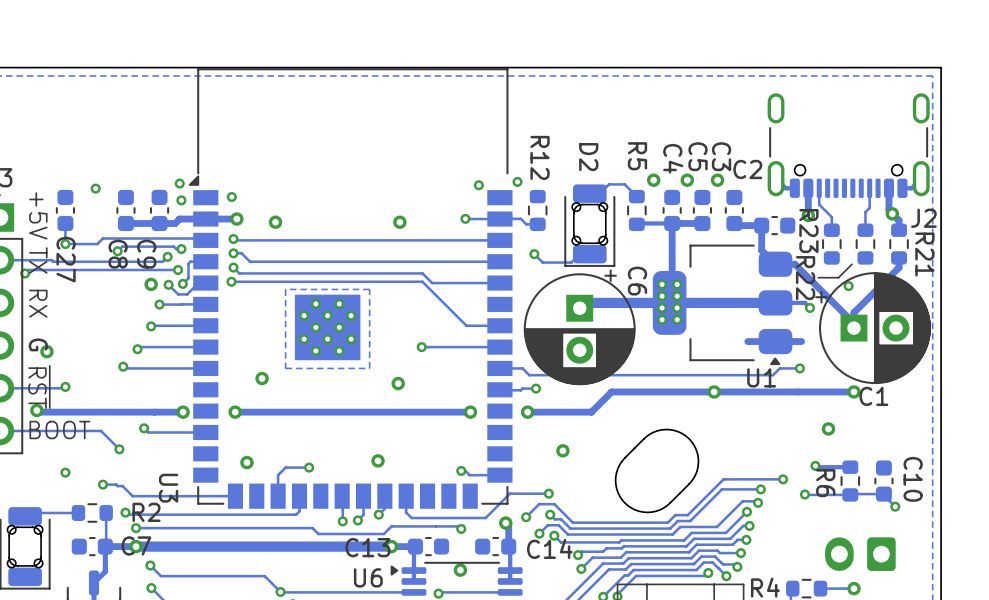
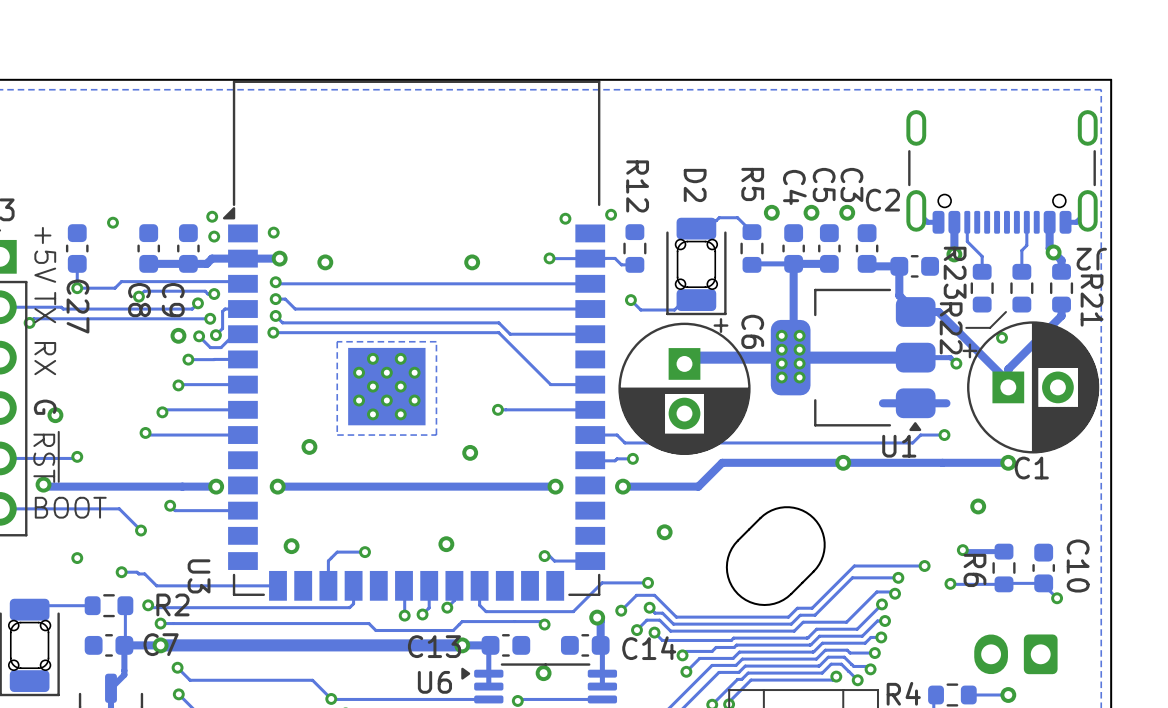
J2 name rotation: 0° (923, 218) -> 180° (1091, 259)

